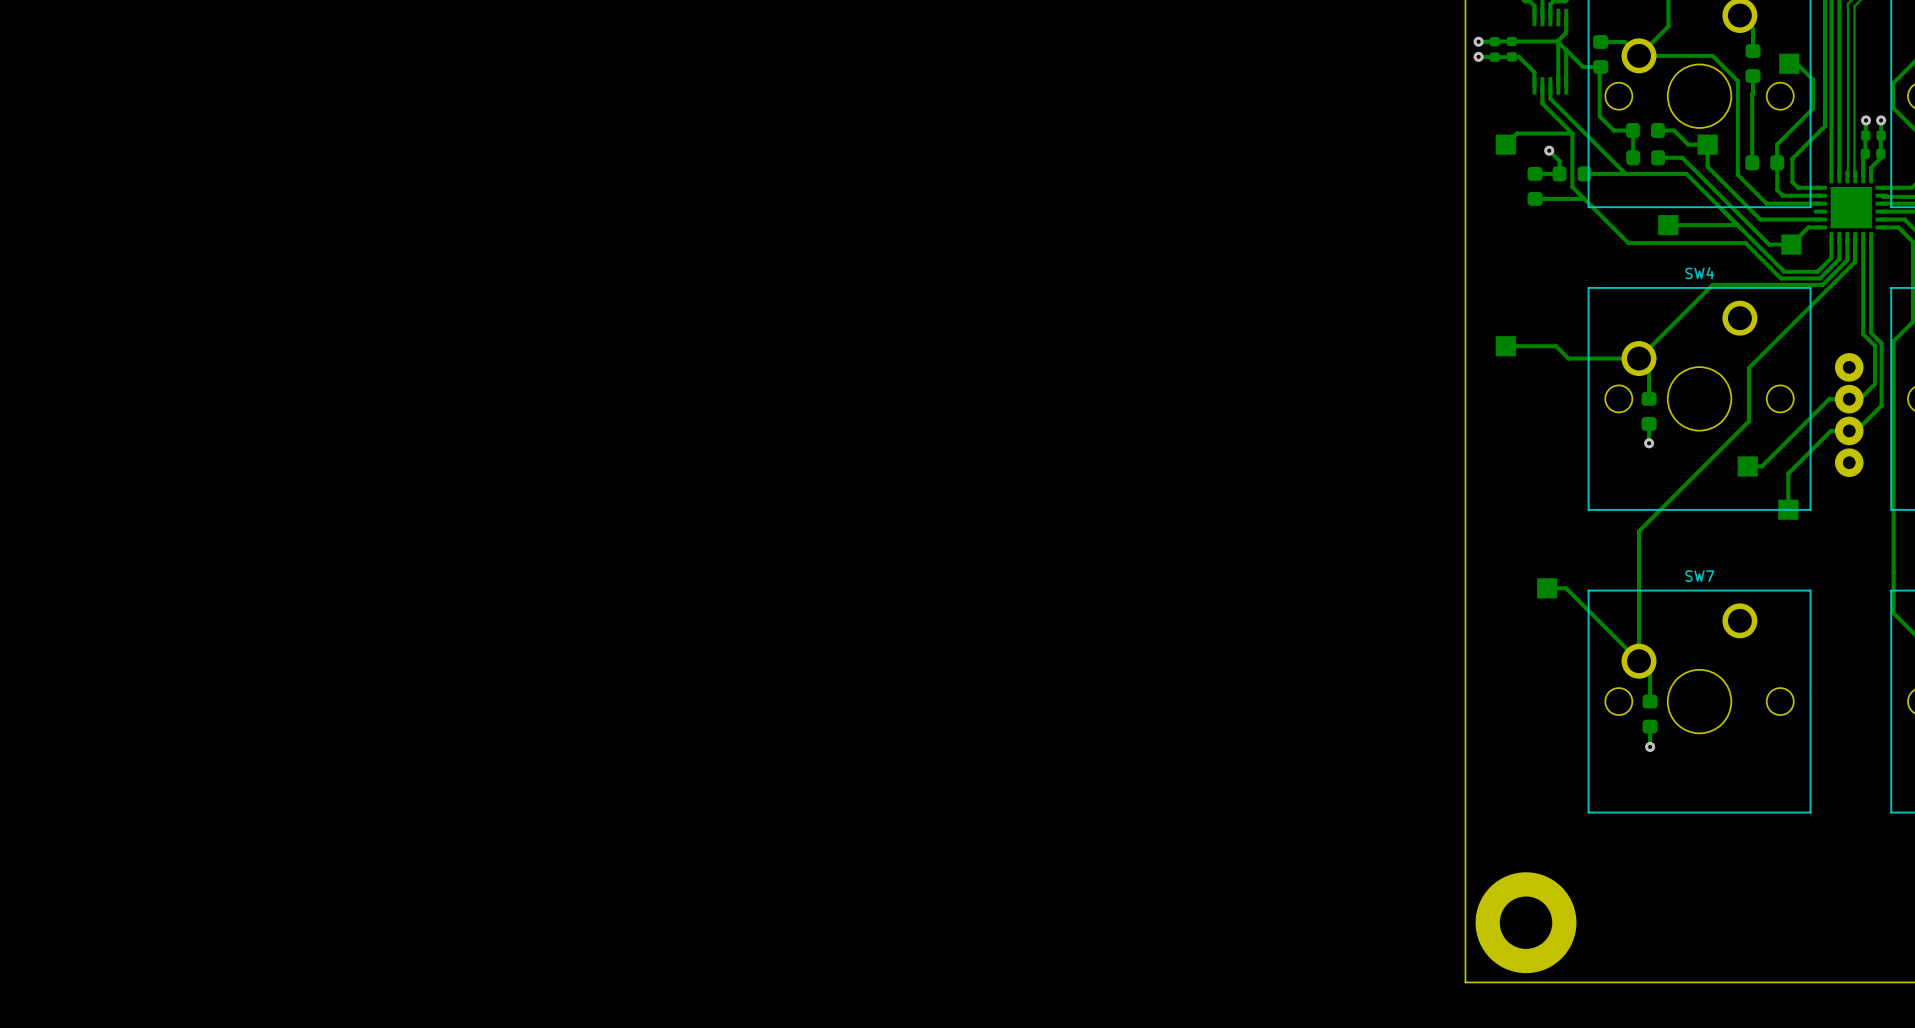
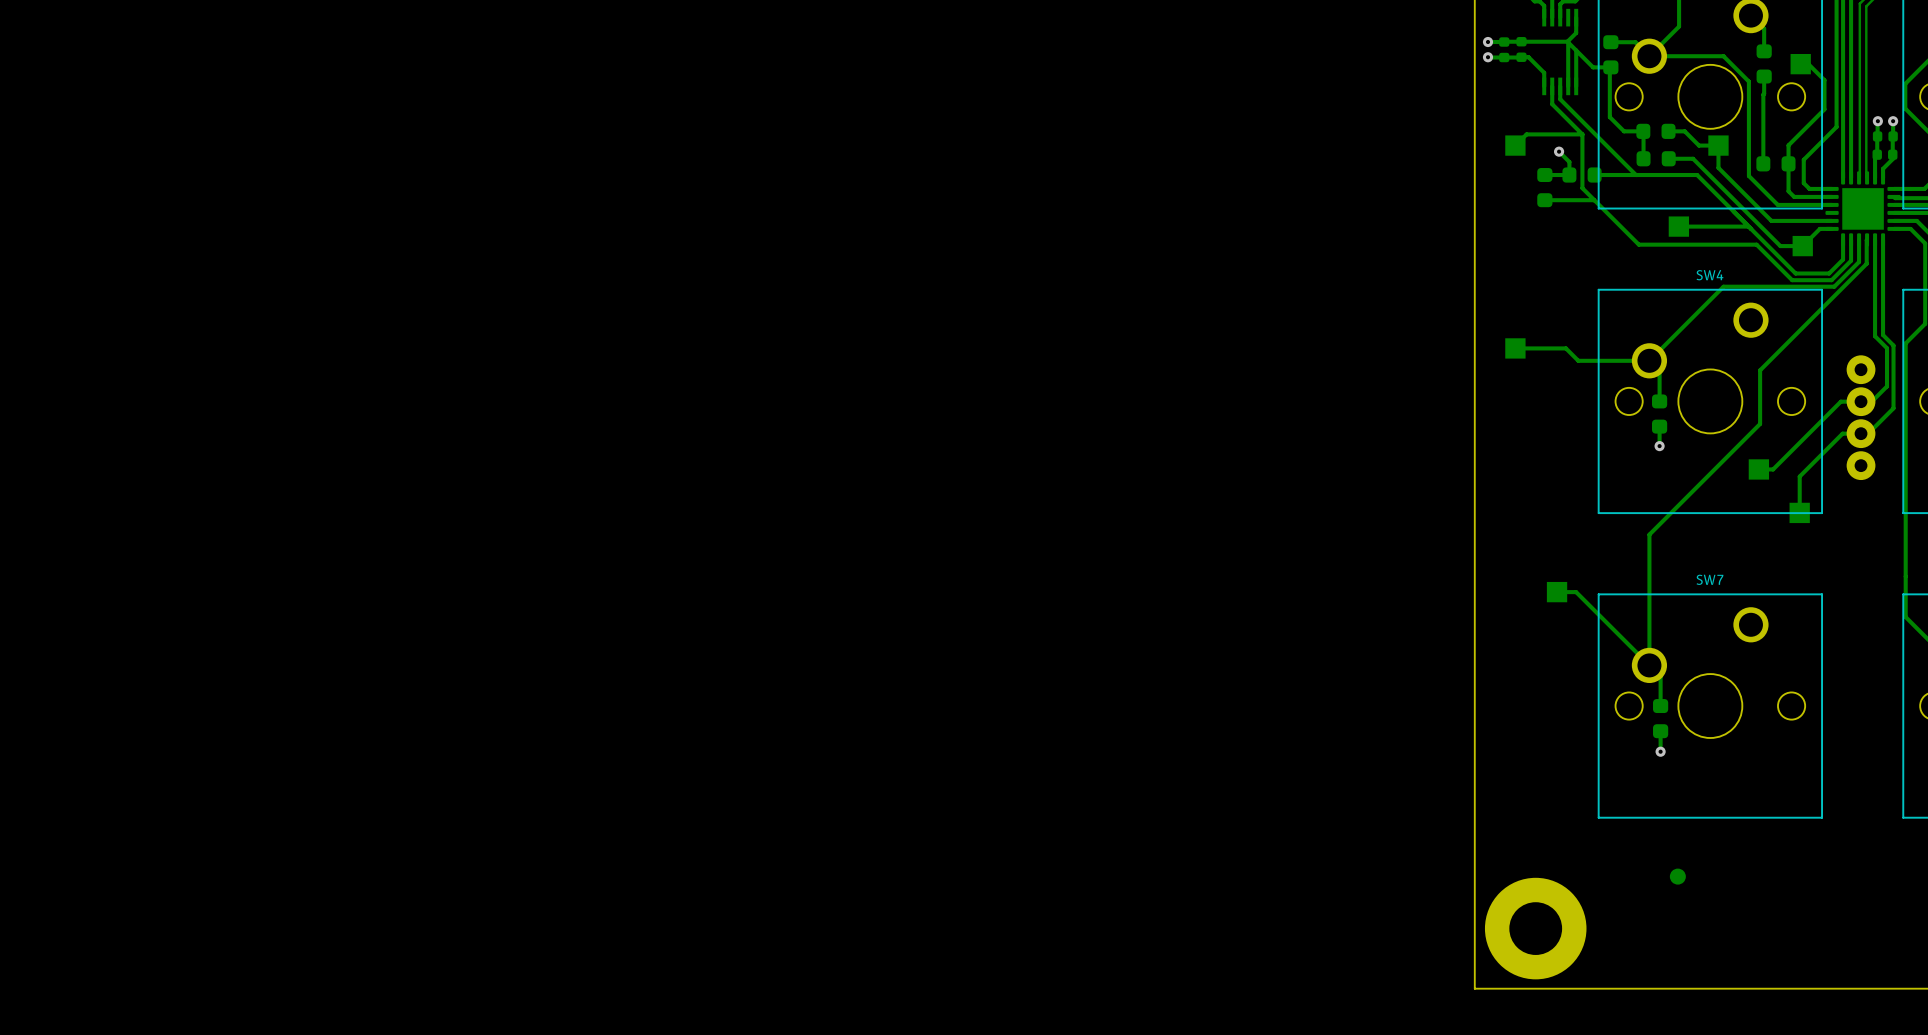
part: none -> (1677, 876)

